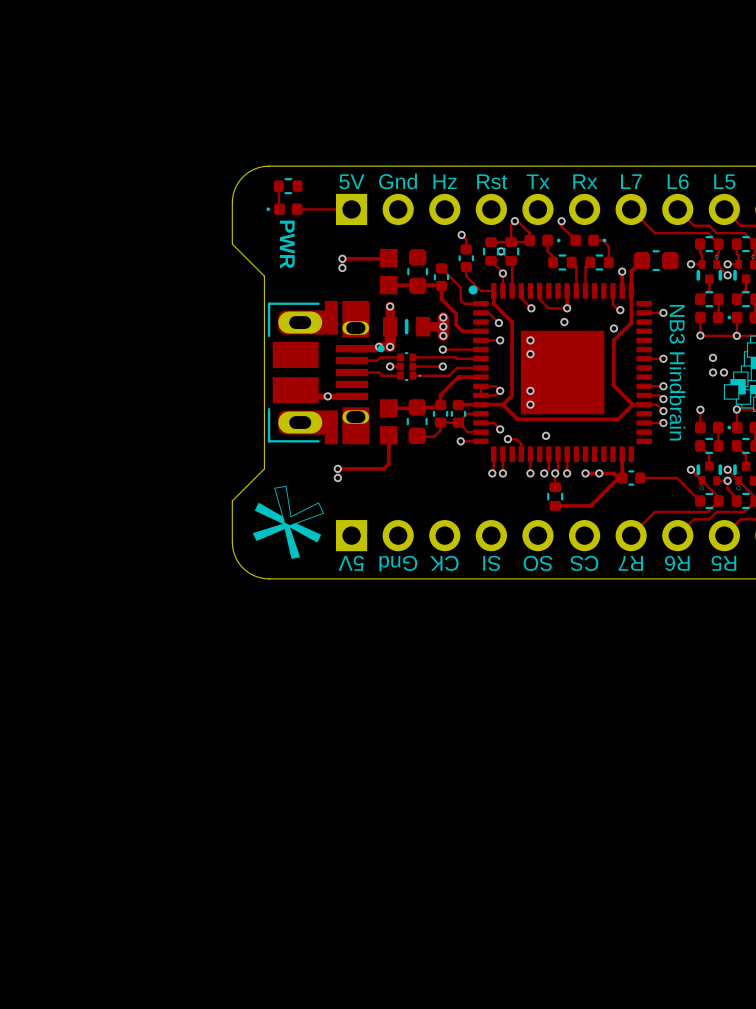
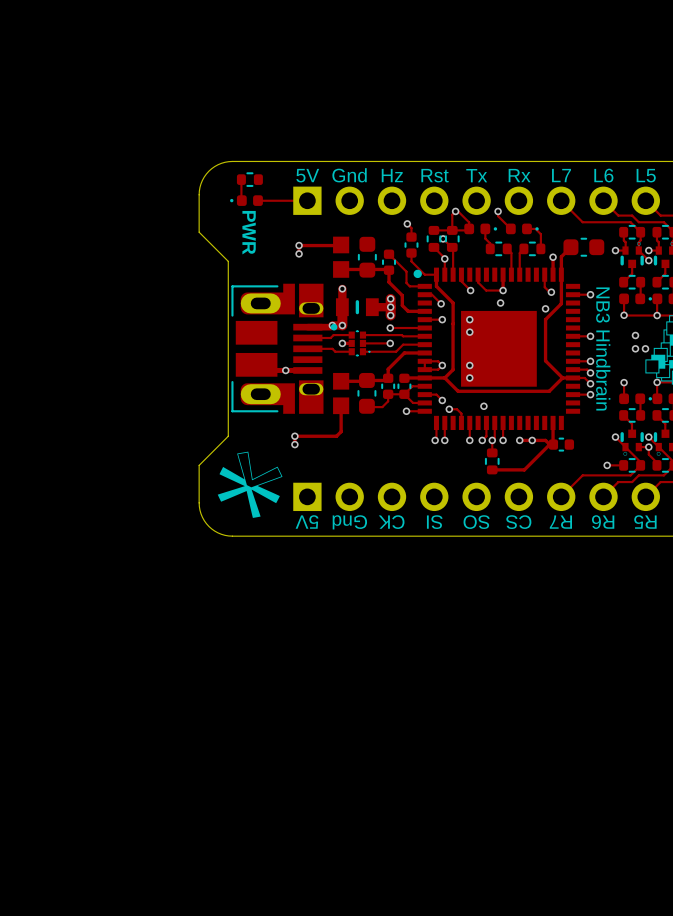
track: (640, 478) (677, 478) (699, 500) -> (607, 465) (623, 465)
via: none -> (607, 465)

